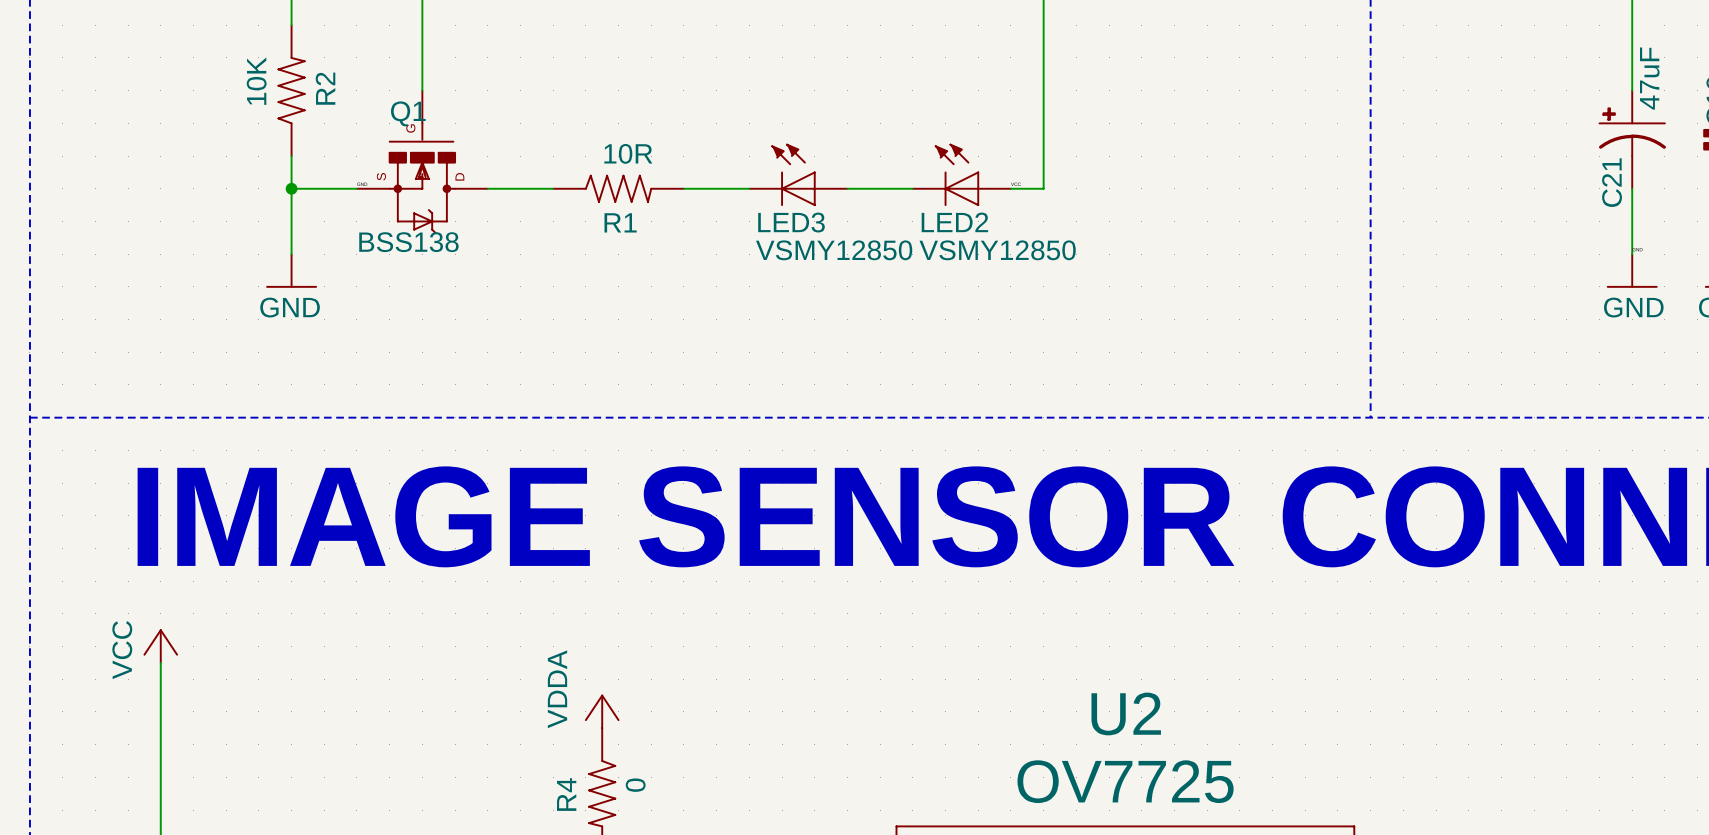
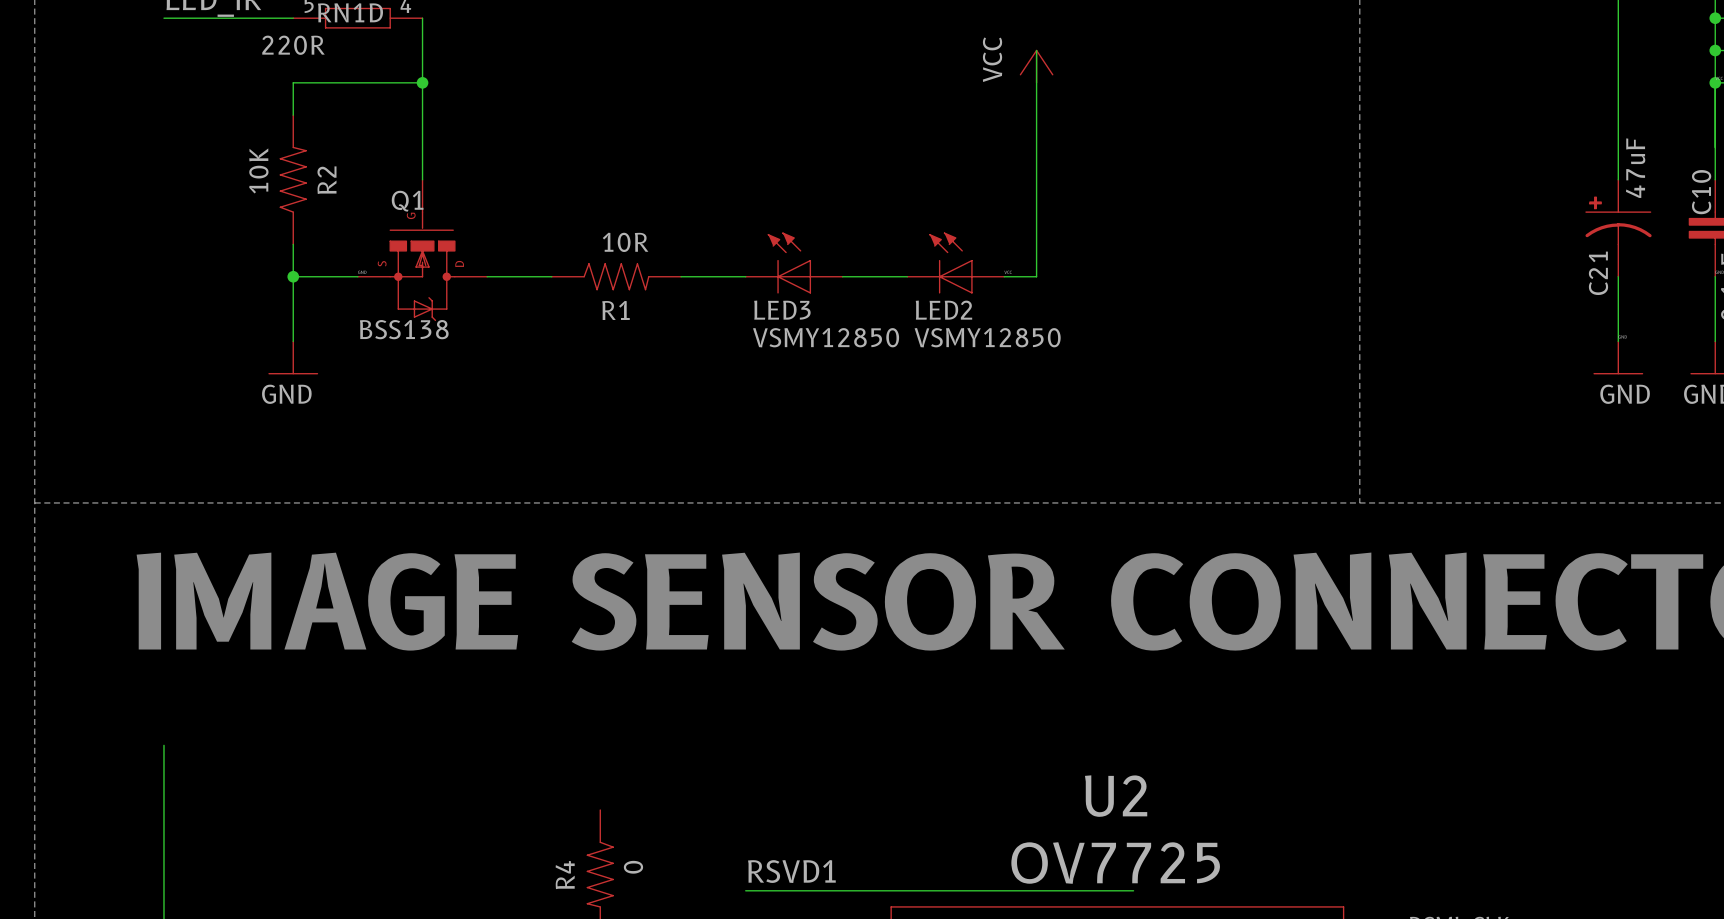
power symbol: VCC (160, 646) -> none
power symbol: VDDA (602, 711) -> none
label: none -> RSVD1 (791, 871)
wire: none -> (745, 890) (1133, 890)

